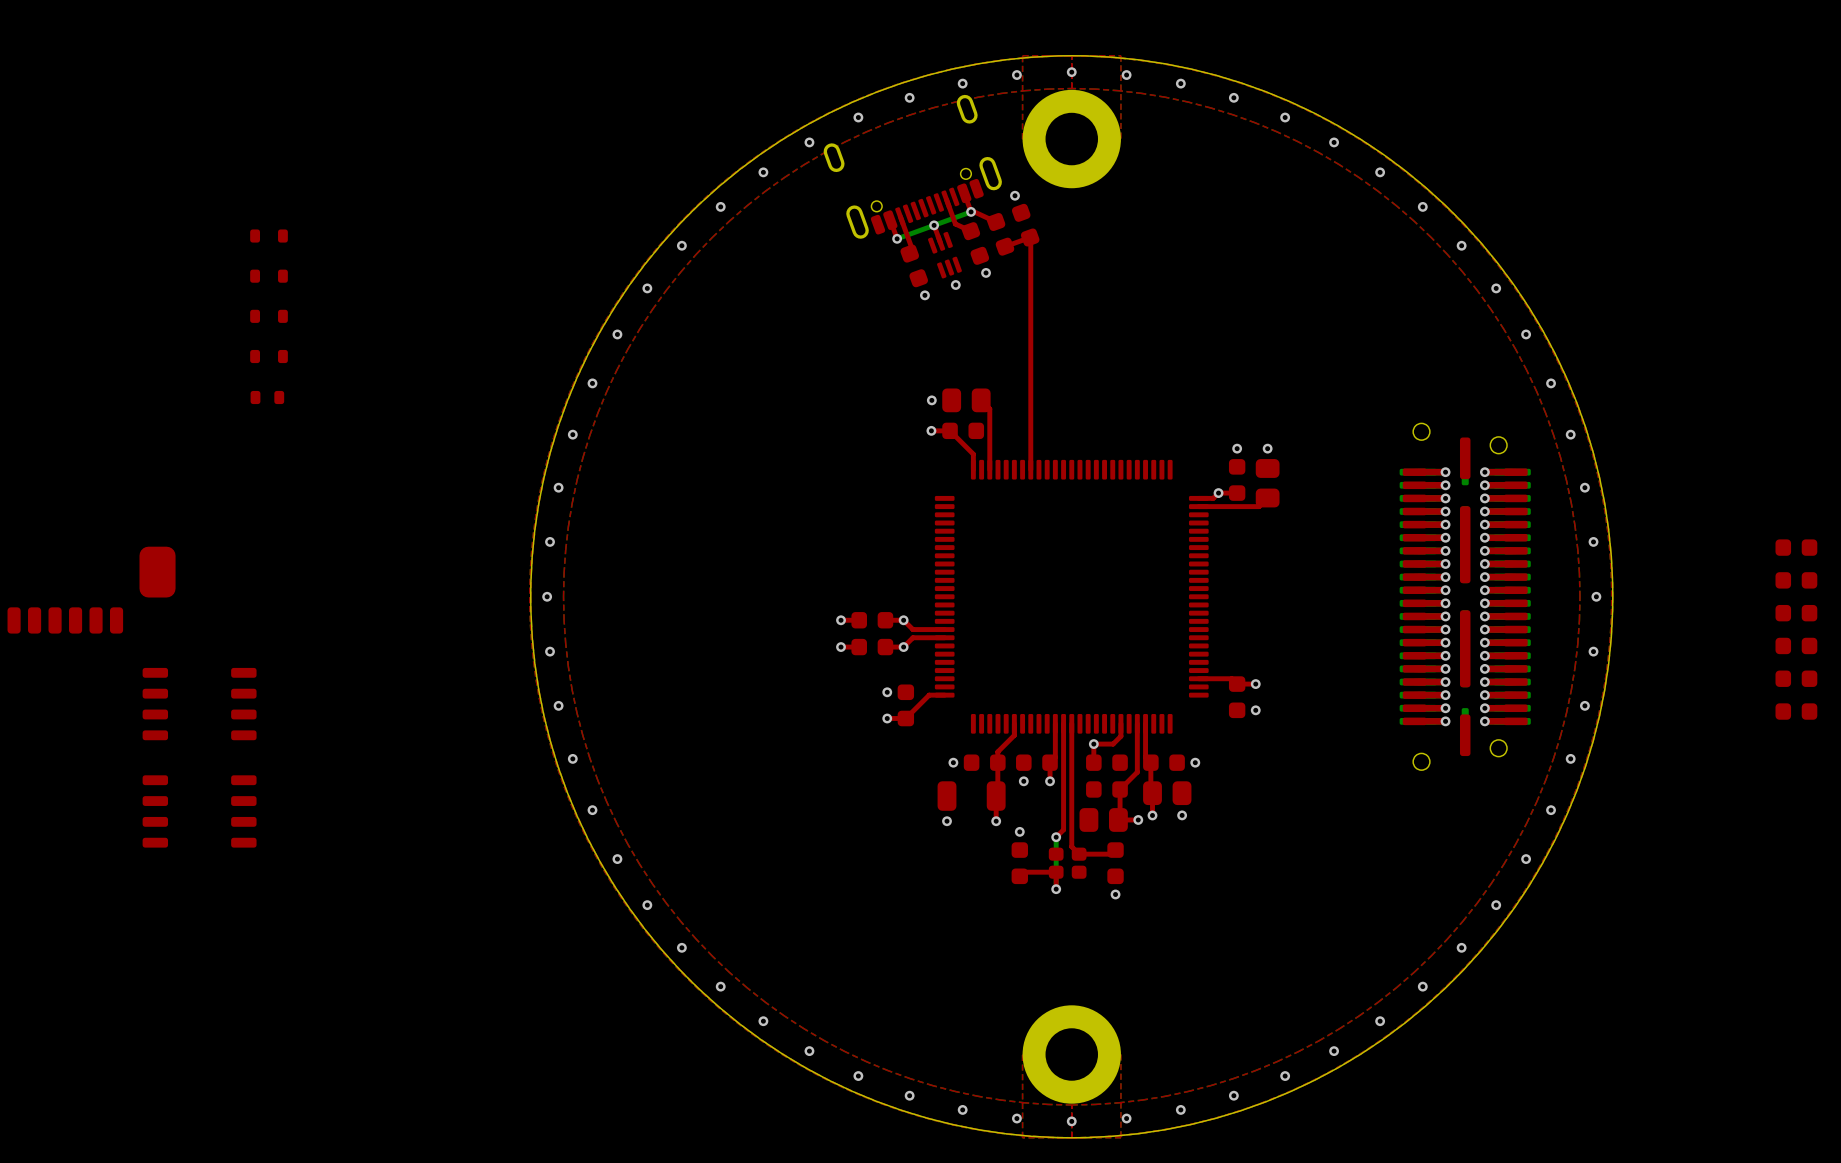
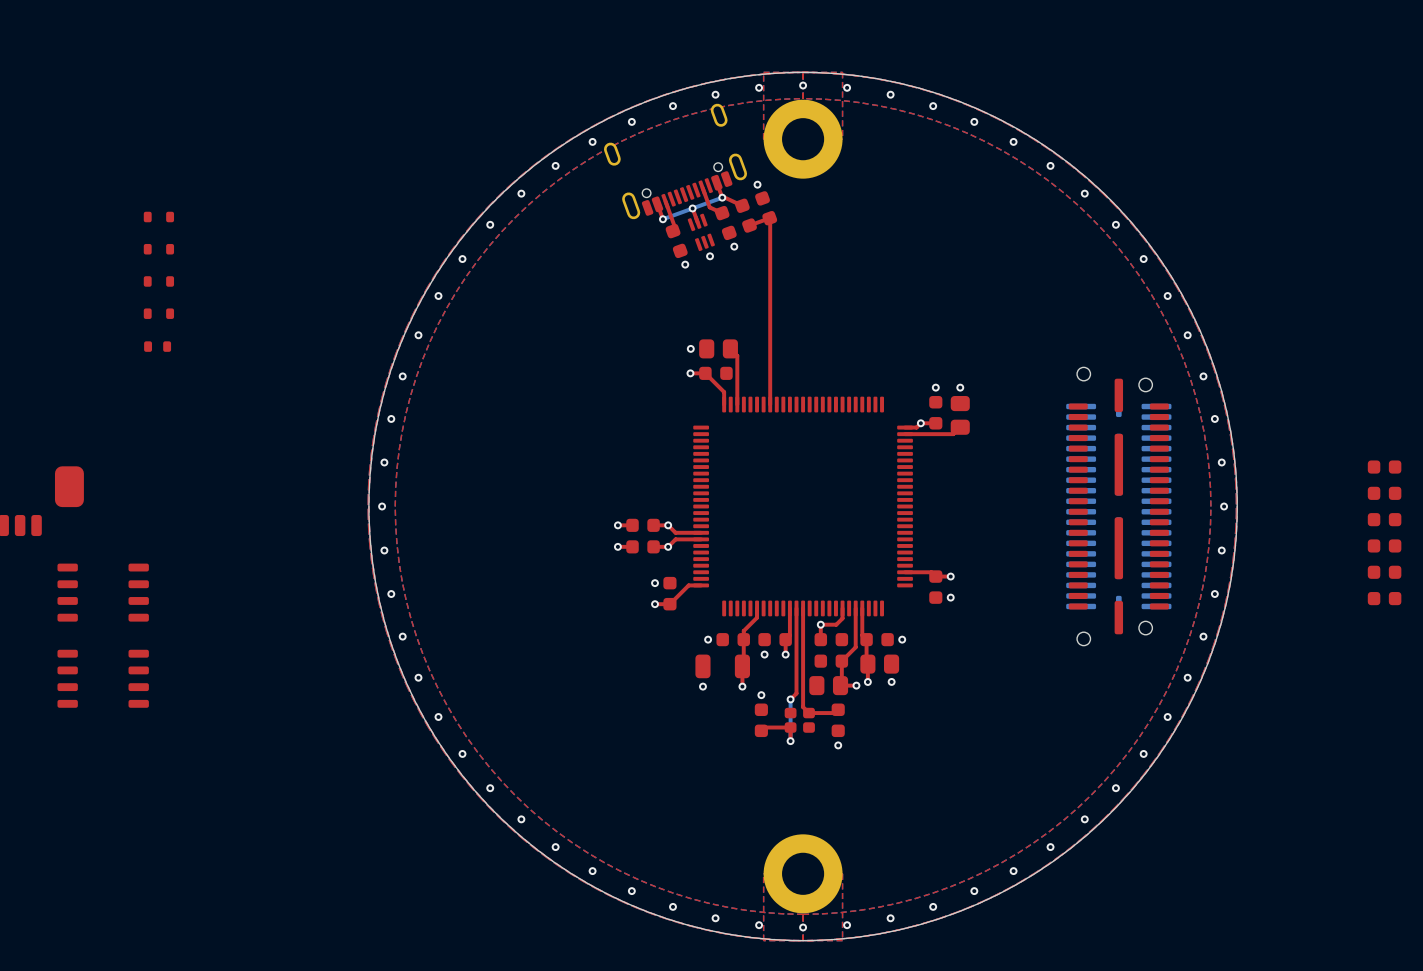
top track: (1414, 472) (1445, 472) -> none
via: (1445, 472) -> none
top track: (1484, 472) (1515, 472) -> none
via: (1484, 472) -> none
top track: (1414, 485) (1445, 485) -> none
via: (1445, 485) -> none
top track: (1484, 485) (1515, 485) -> none
via: (1484, 485) -> none
top track: (1414, 498) (1445, 498) -> none
via: (1445, 498) -> none
top track: (1484, 498) (1515, 498) -> none
via: (1484, 498) -> none
top track: (1414, 511) (1445, 511) -> none
via: (1445, 511) -> none
top track: (1484, 511) (1515, 511) -> none
via: (1484, 511) -> none
top track: (1414, 524) (1445, 524) -> none
via: (1445, 524) -> none
top track: (1484, 524) (1515, 524) -> none
via: (1484, 524) -> none
top track: (1414, 537) (1445, 537) -> none
via: (1445, 537) -> none
top track: (1484, 537) (1515, 537) -> none
via: (1484, 537) -> none
top track: (1414, 550) (1445, 550) -> none
via: (1445, 550) -> none
top track: (1484, 550) (1515, 550) -> none
via: (1484, 550) -> none
top track: (1414, 563) (1445, 563) -> none
via: (1445, 563) -> none
top track: (1484, 563) (1515, 563) -> none
via: (1484, 563) -> none
top track: (1414, 577) (1445, 577) -> none
via: (1445, 577) -> none
top track: (1484, 577) (1515, 577) -> none
via: (1484, 577) -> none
top track: (1414, 590) (1445, 590) -> none
via: (1445, 590) -> none
top track: (1484, 590) (1515, 590) -> none
via: (1484, 590) -> none
top track: (1414, 603) (1445, 603) -> none
via: (1445, 603) -> none
top track: (1484, 603) (1515, 603) -> none
via: (1484, 603) -> none
top track: (1414, 616) (1445, 616) -> none
via: (1445, 616) -> none
top track: (1484, 616) (1515, 616) -> none
via: (1484, 616) -> none
top track: (1414, 629) (1445, 629) -> none
via: (1445, 629) -> none
top track: (1484, 629) (1515, 629) -> none
via: (1484, 629) -> none
top track: (1414, 642) (1445, 642) -> none
via: (1445, 642) -> none
top track: (1484, 642) (1515, 642) -> none
via: (1484, 642) -> none
top track: (1414, 655) (1445, 655) -> none
via: (1445, 655) -> none
top track: (1484, 655) (1515, 655) -> none
via: (1484, 655) -> none
top track: (1414, 668) (1445, 668) -> none
via: (1445, 668) -> none
top track: (1484, 668) (1515, 668) -> none
via: (1484, 668) -> none
top track: (1414, 682) (1445, 682) -> none
via: (1445, 682) -> none
top track: (1484, 682) (1515, 682) -> none
via: (1484, 682) -> none
top track: (1414, 695) (1445, 695) -> none
via: (1445, 695) -> none
top track: (1484, 695) (1515, 695) -> none
via: (1484, 695) -> none
top track: (1414, 708) (1445, 708) -> none
via: (1445, 708) -> none
top track: (1484, 708) (1515, 708) -> none
via: (1484, 708) -> none
top track: (1414, 721) (1445, 721) -> none
via: (1445, 721) -> none
top track: (1484, 721) (1515, 721) -> none
via: (1484, 721) -> none

